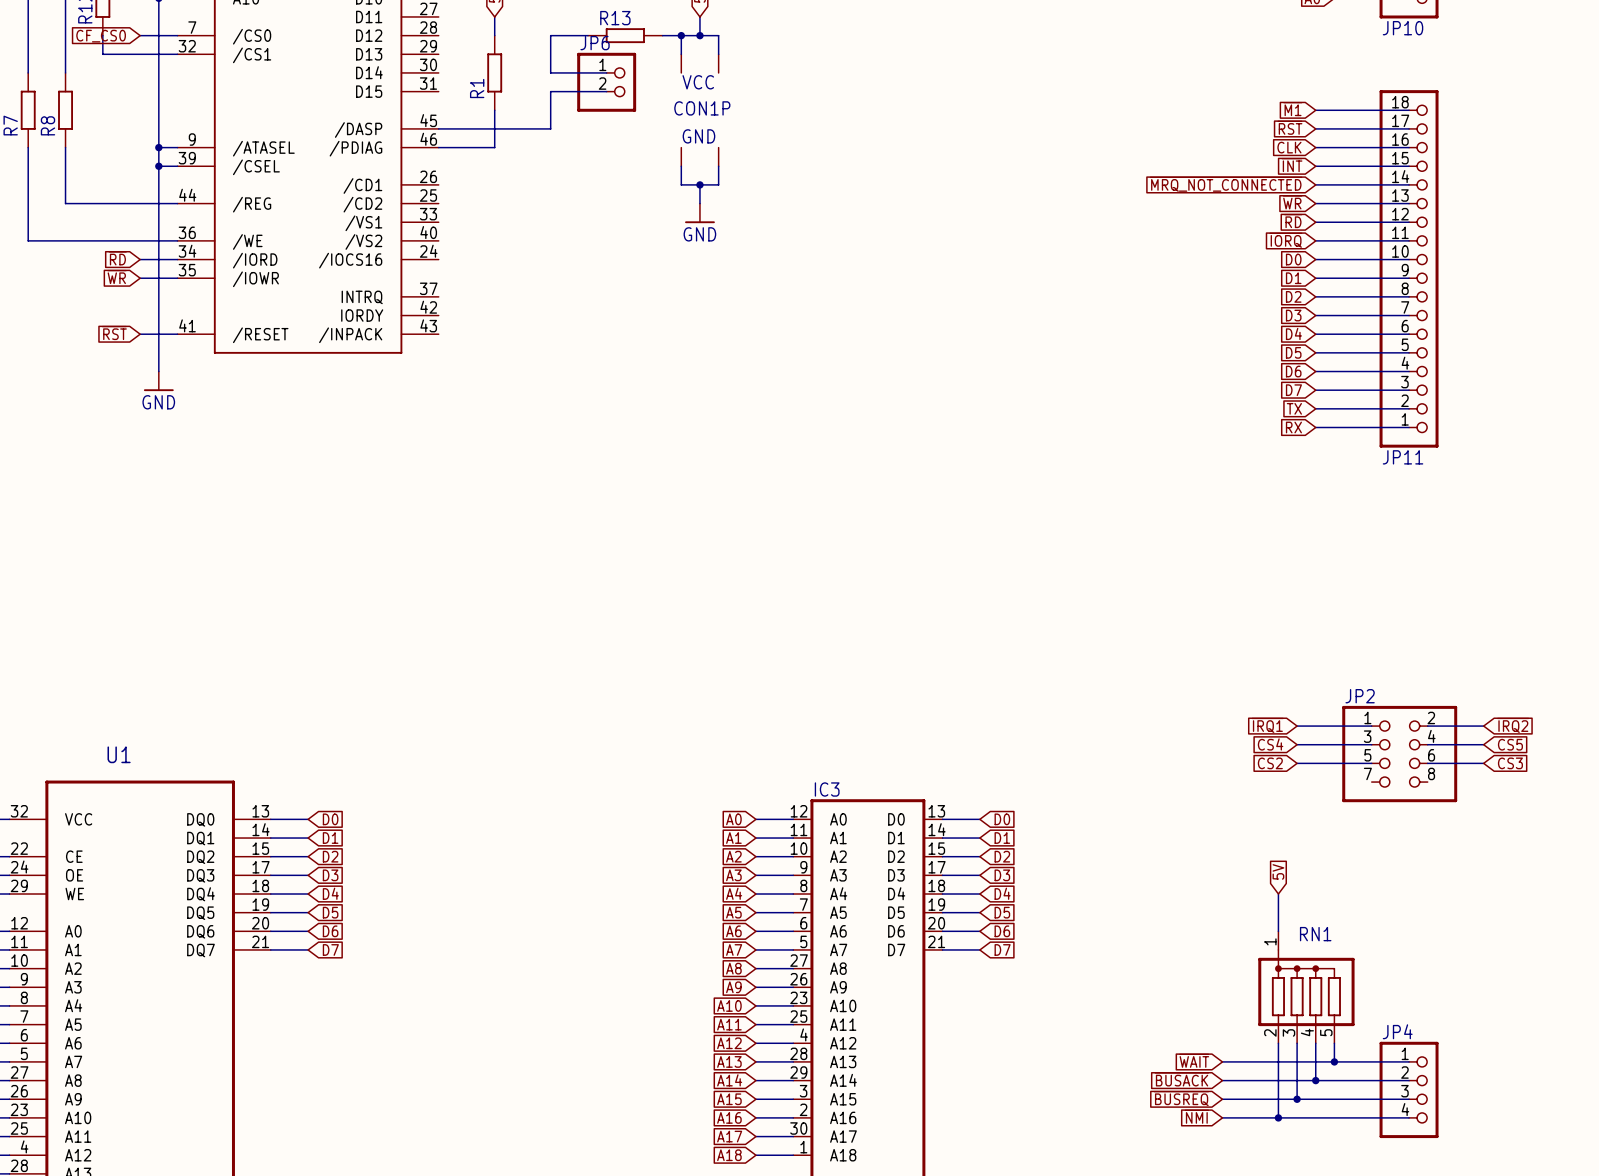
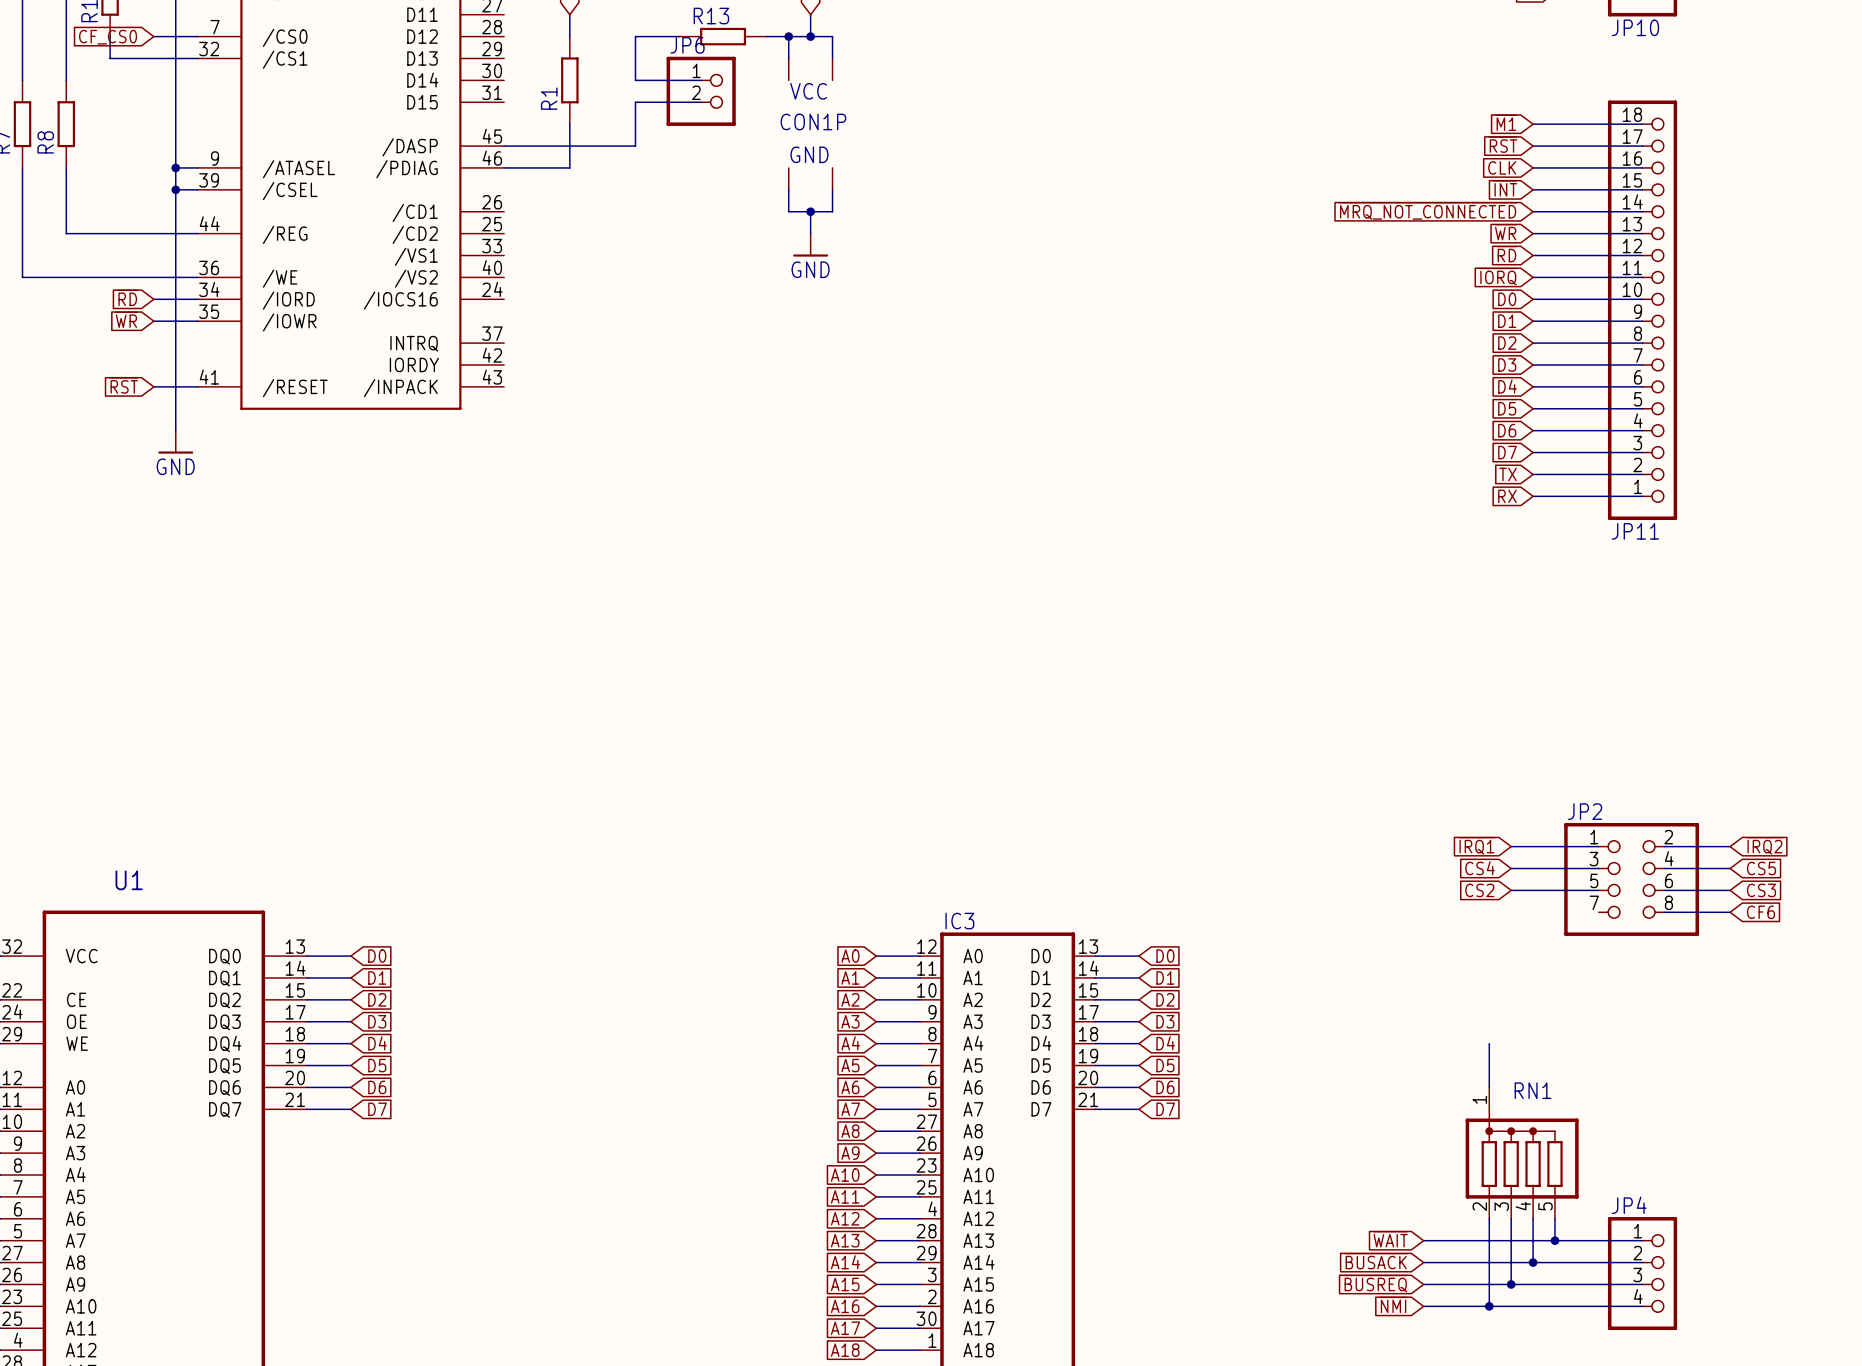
wire: none -> (1664, 912) (1730, 912)
global label: none -> CF6 (1760, 912)
global label: 5V (1278, 871) -> none

